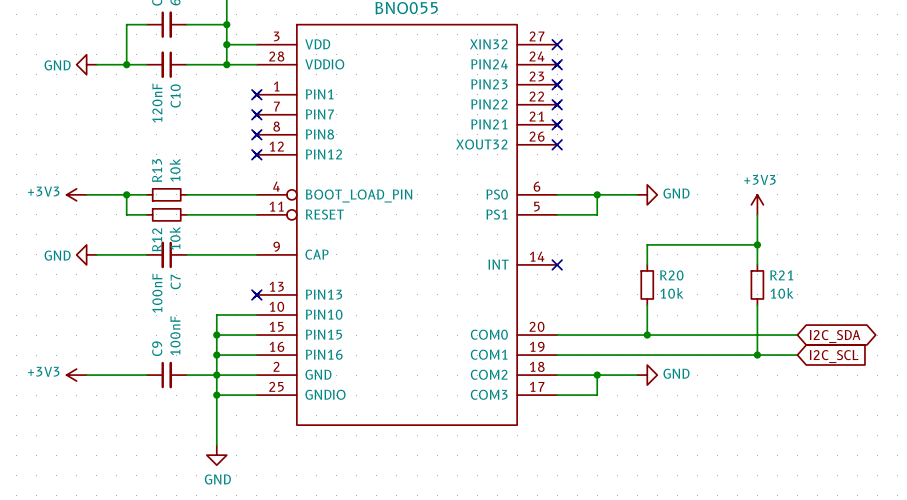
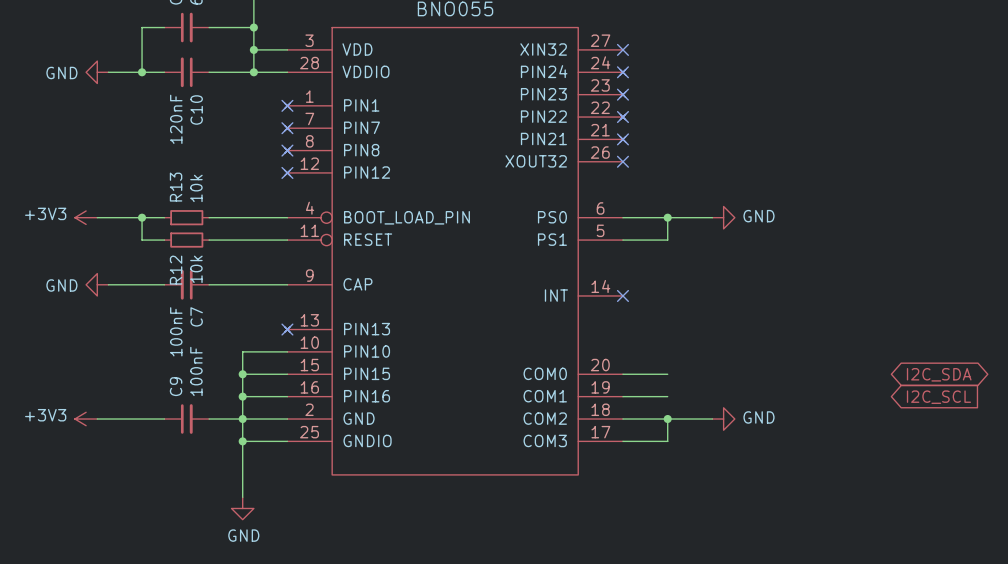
power symbol: +3V3 (757, 204) -> none
wire: (757, 214) (757, 264) -> none
wire: (757, 244) (647, 244) (647, 264) -> none
junction: (757, 244) -> none
R20: 10k (647, 284) -> none
R21: 10k (757, 284) -> none
wire: (647, 304) (647, 335) -> none
wire: (757, 304) (757, 355) -> none
wire: (597, 335) (797, 335) -> none
junction: (647, 335) -> none
wire: (597, 355) (797, 355) -> none
junction: (757, 355) -> none

